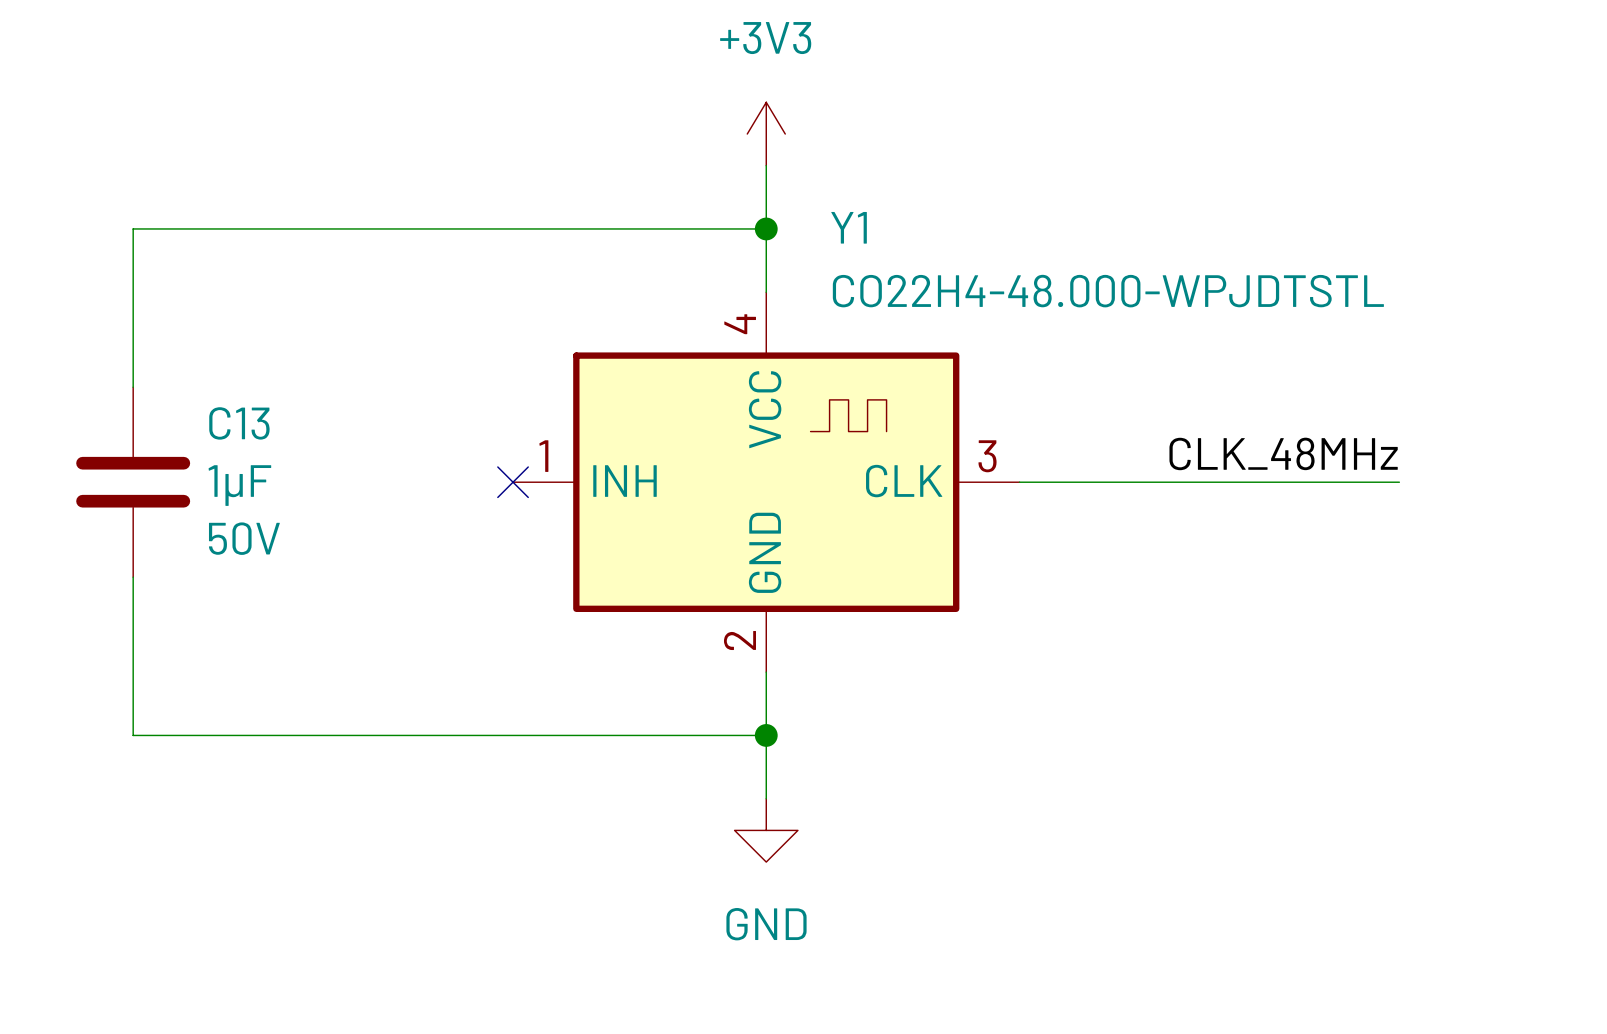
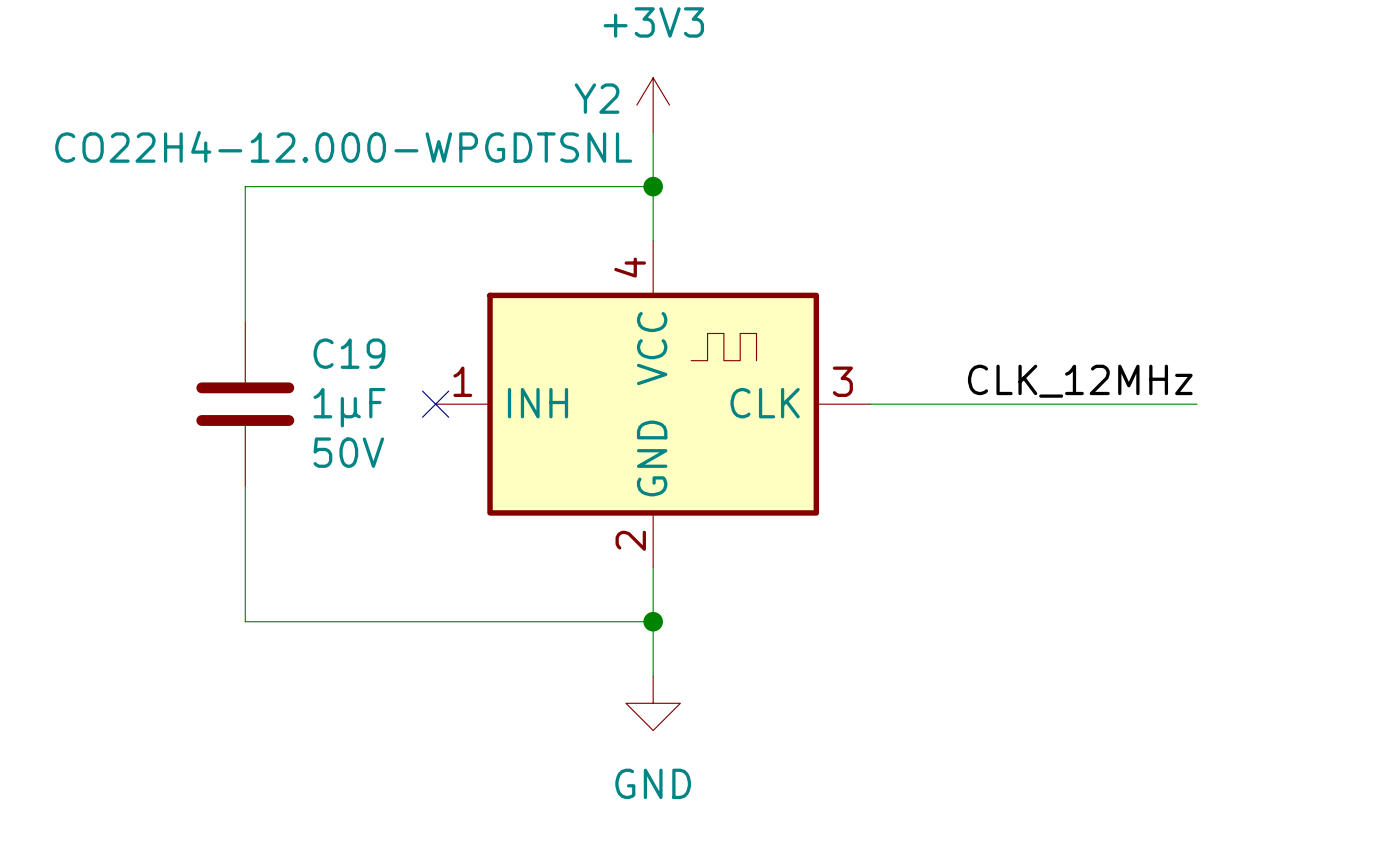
Y1 name: Y1 (849, 227) -> Y2 (597, 98)
wire: (291, 228) (133, 228) (133, 387) -> (245, 186) (245, 322)
Y1 value: CO22H4-48.000-WPJDTSTL (1108, 291) -> CO22H4-12.000-WPGDTSNL (343, 146)
label: CLK_48MHz (1283, 453) -> CLK_12MHz (1080, 381)
C13: 1µF (133, 482) -> none
C19: none -> 1µF (245, 404)
wire: (133, 577) (133, 735) (291, 735) -> (245, 485) (245, 621)

